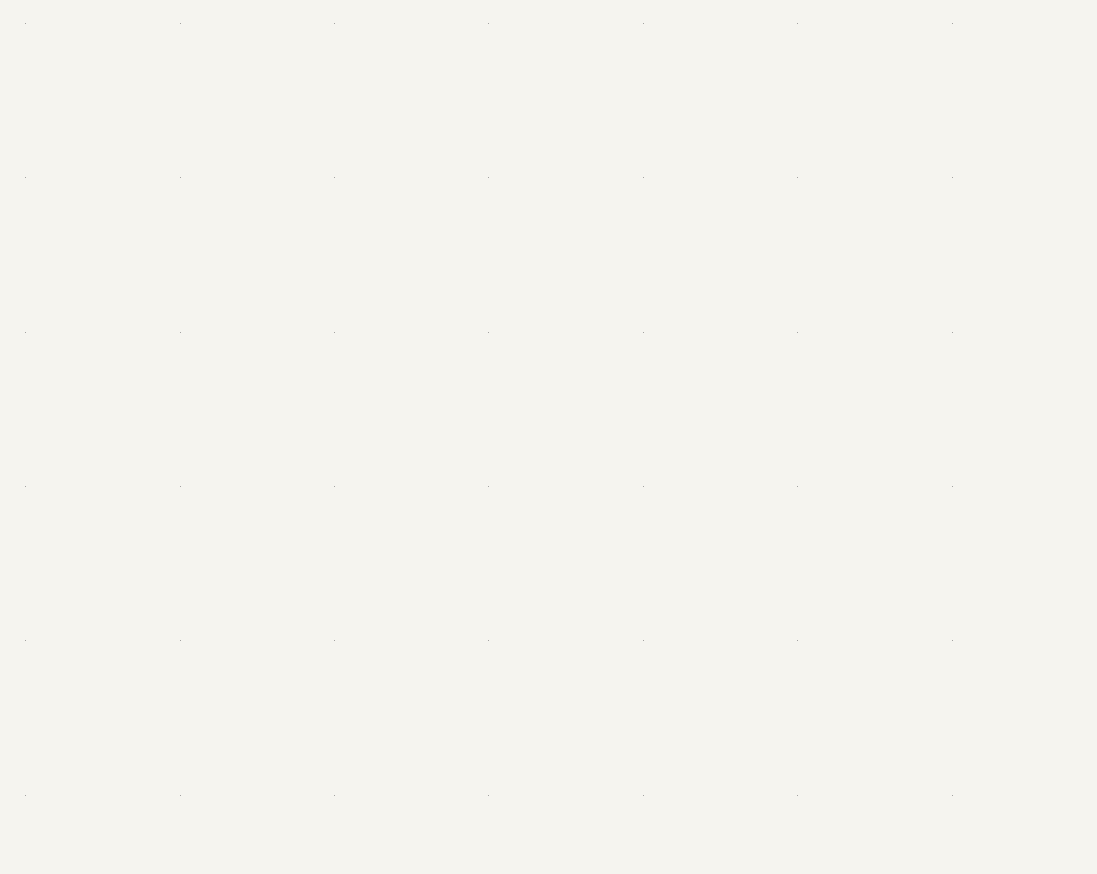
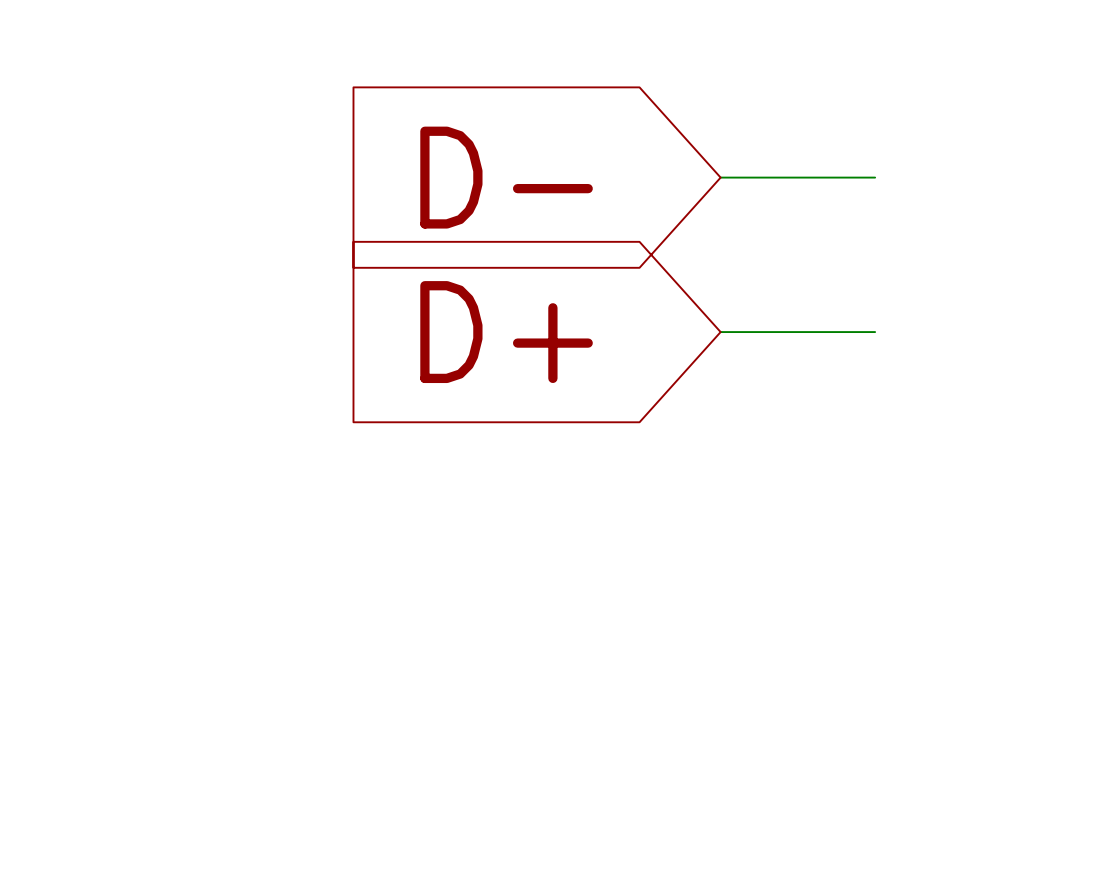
global label: none -> D- (506, 177)
wire: none -> (720, 177) (875, 177)
global label: none -> D+ (506, 332)
wire: none -> (720, 332) (875, 332)

